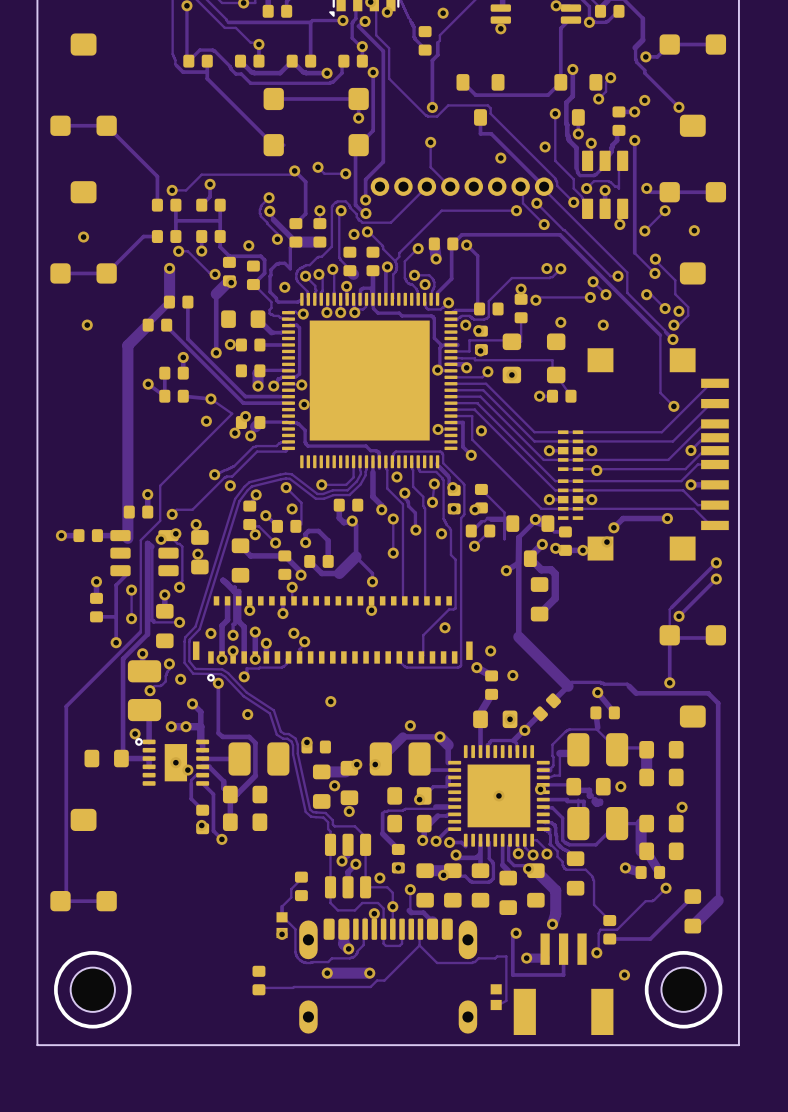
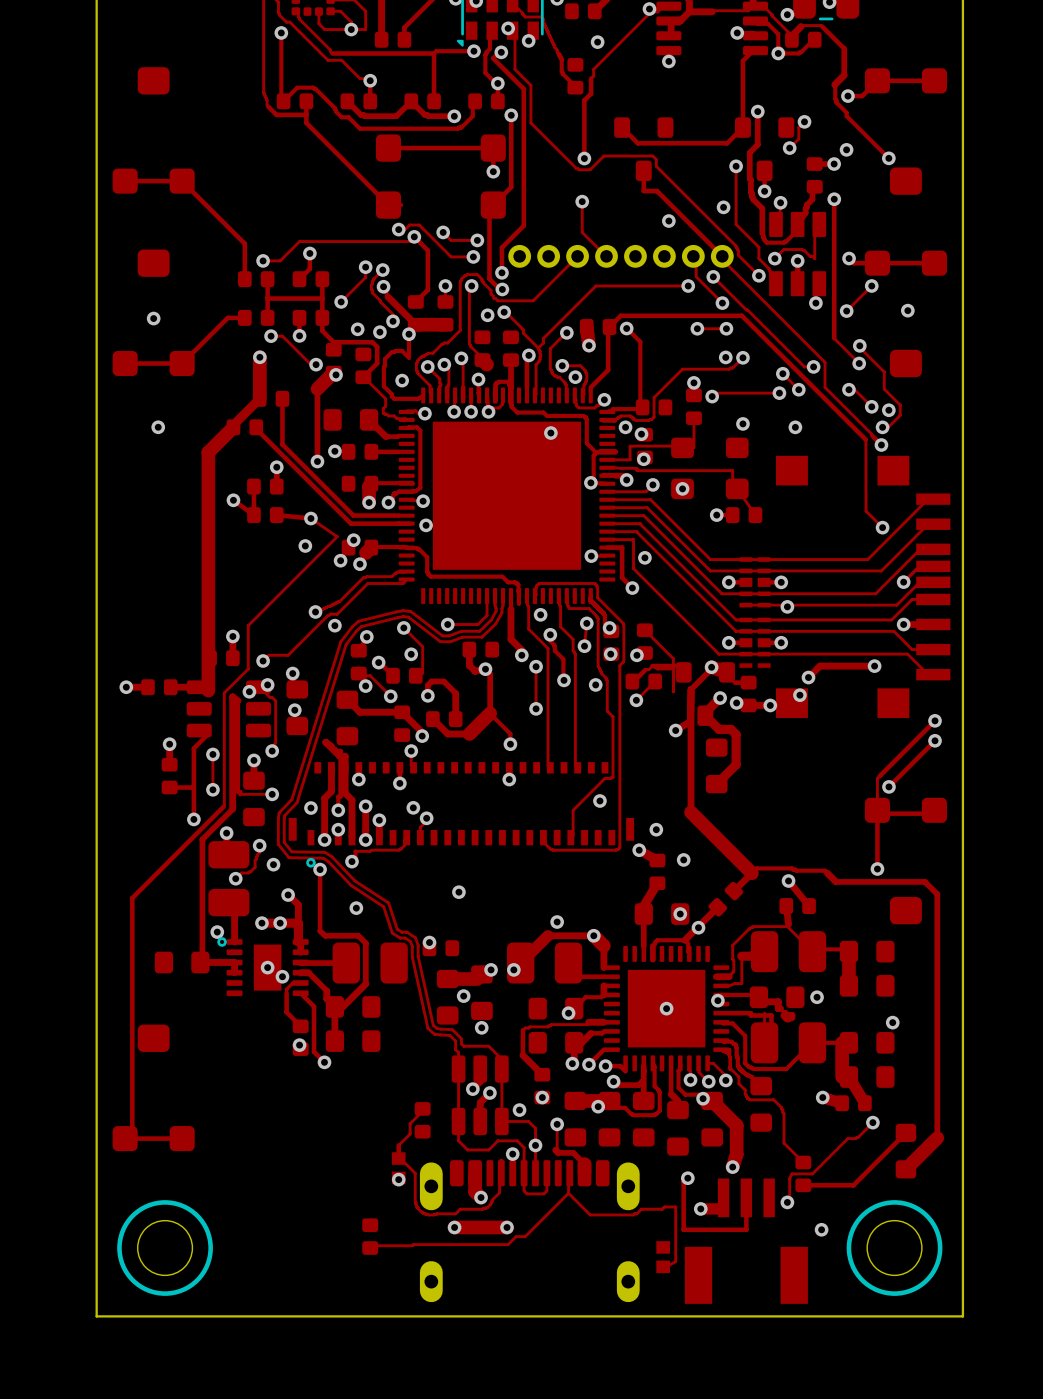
track: none -> (398, 229) (404, 229) (409, 225) (419, 225) (451, 256) (473, 256)
via: none -> (398, 229)
via: none -> (473, 256)
track: none -> (365, 267) (365, 277) (341, 301)
via: none -> (365, 267)
via: none -> (341, 301)
track: none -> (697, 328) (726, 328)
via: none -> (697, 328)
via: none -> (726, 328)
via: none -> (379, 332)
via: none -> (408, 334)
via: none -> (550, 433)

